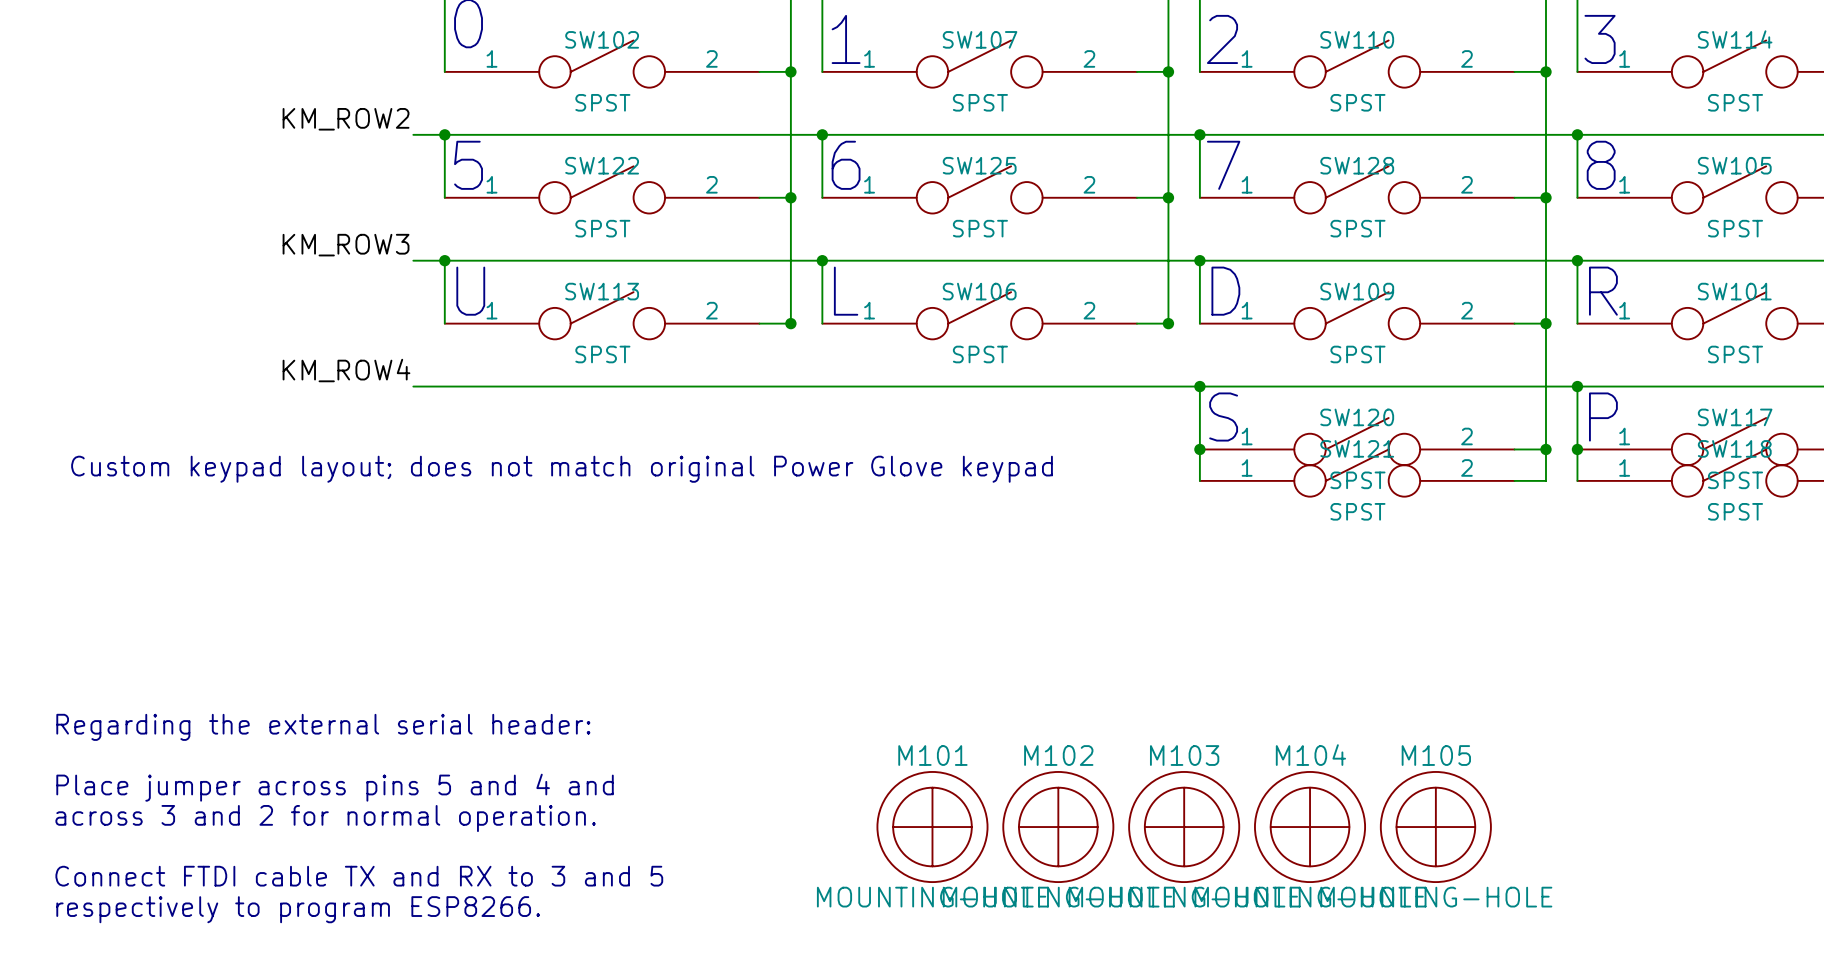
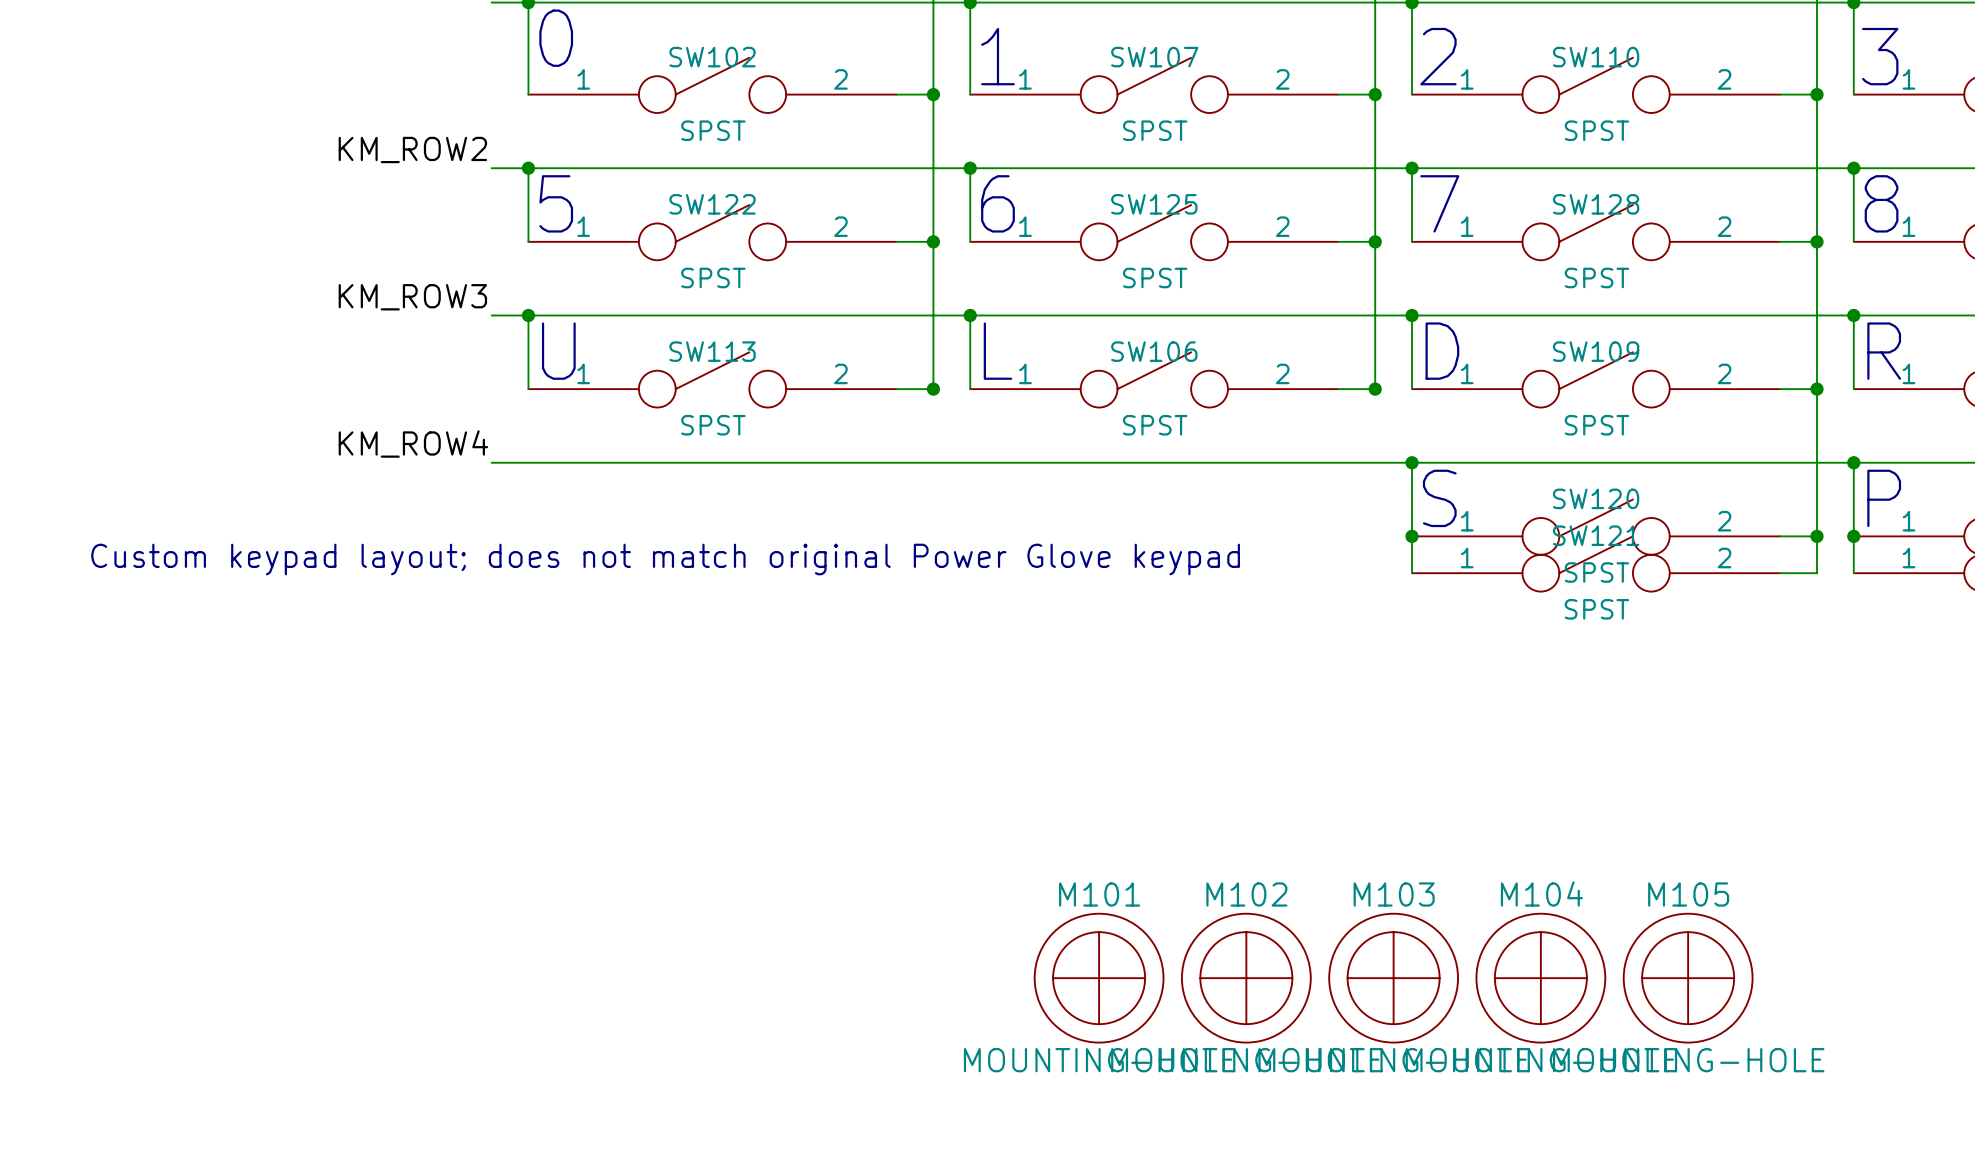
text: Regarding the external serial header: (323, 727) -> none
text: Place jumper across pins 5 and 4 and (335, 787) -> none
text: across 3 and 2 for normal operation. (325, 818) -> none
text: Connect FTDI cable TX and RX to 3 and 5 (359, 876) -> none
text: respectively to program ESP8266. (298, 909) -> none

